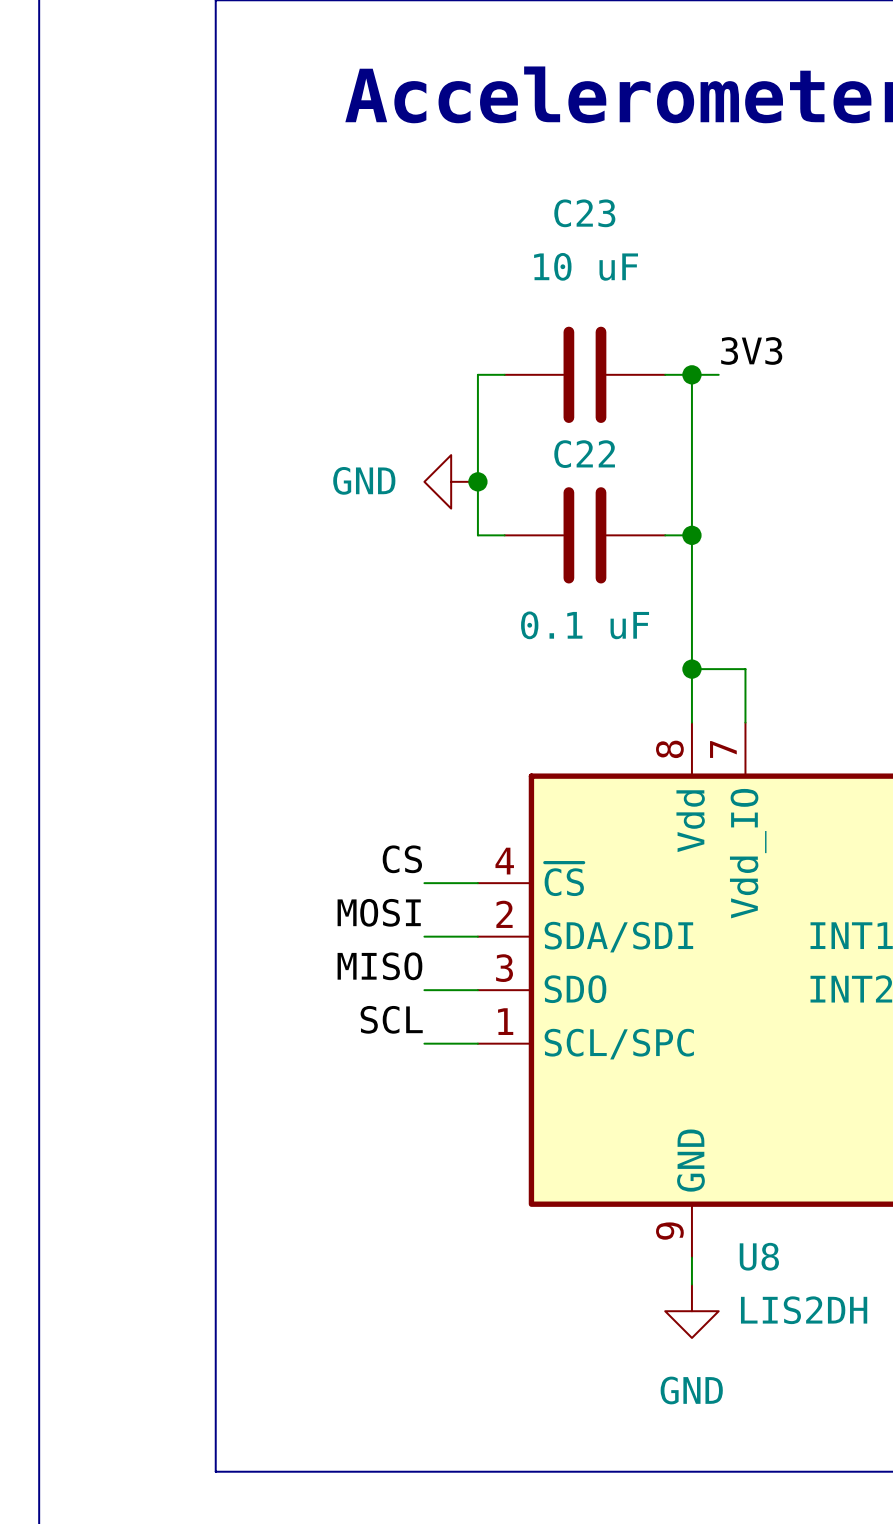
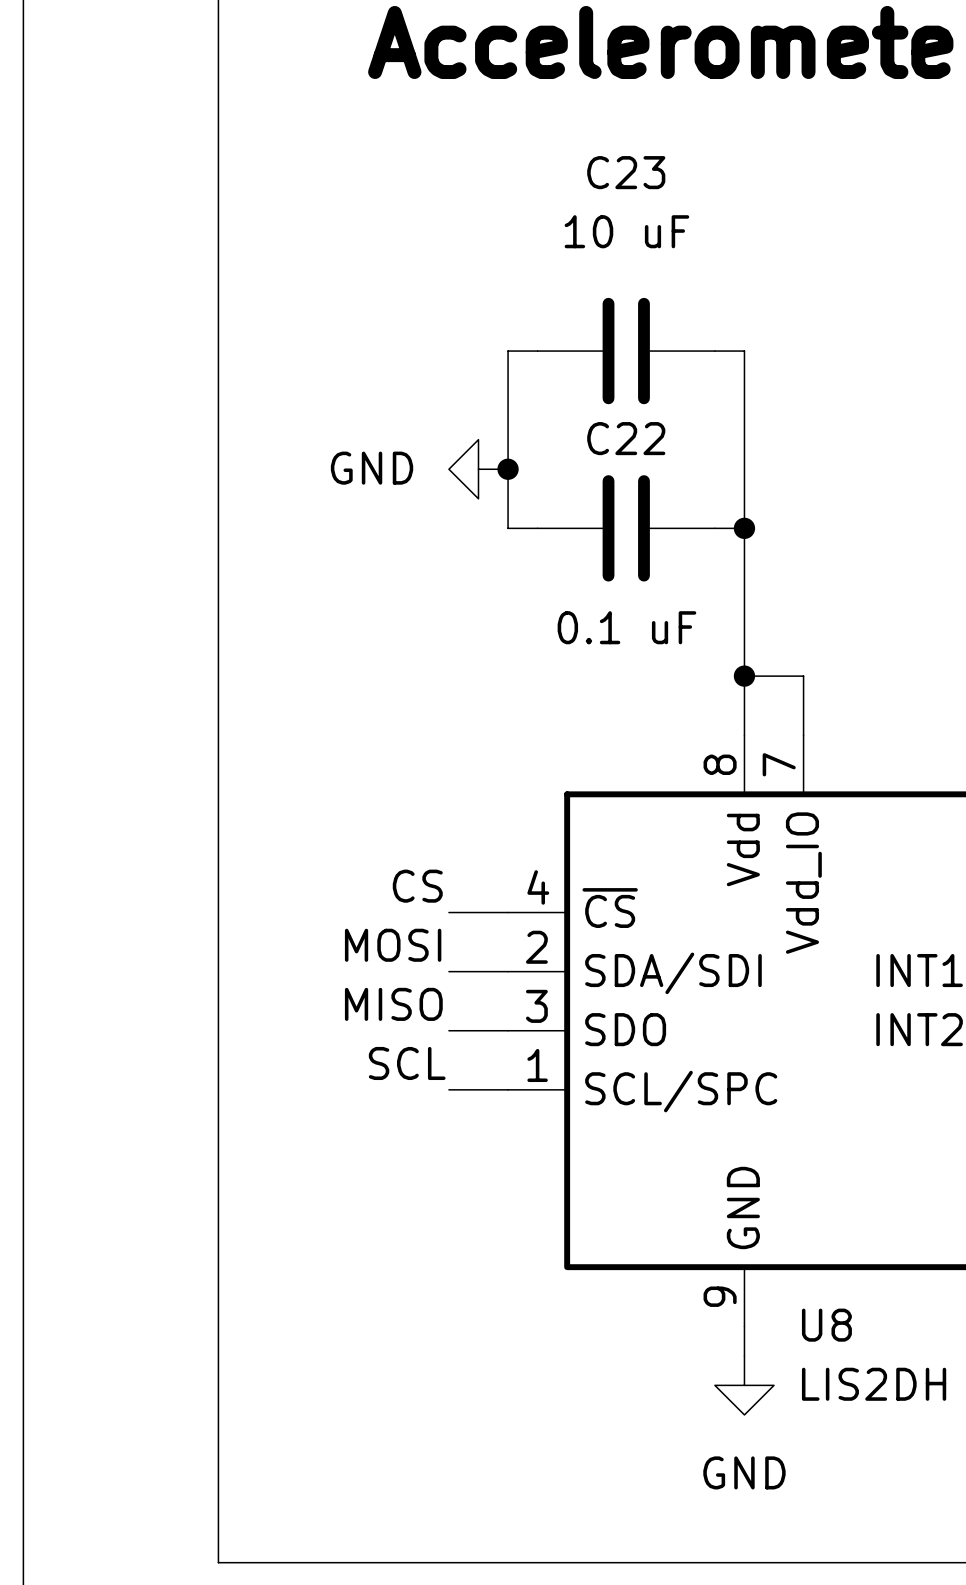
label: 3V3 (751, 350) -> none
wire: (691, 374) (718, 374) -> none
junction: (691, 374) -> none

